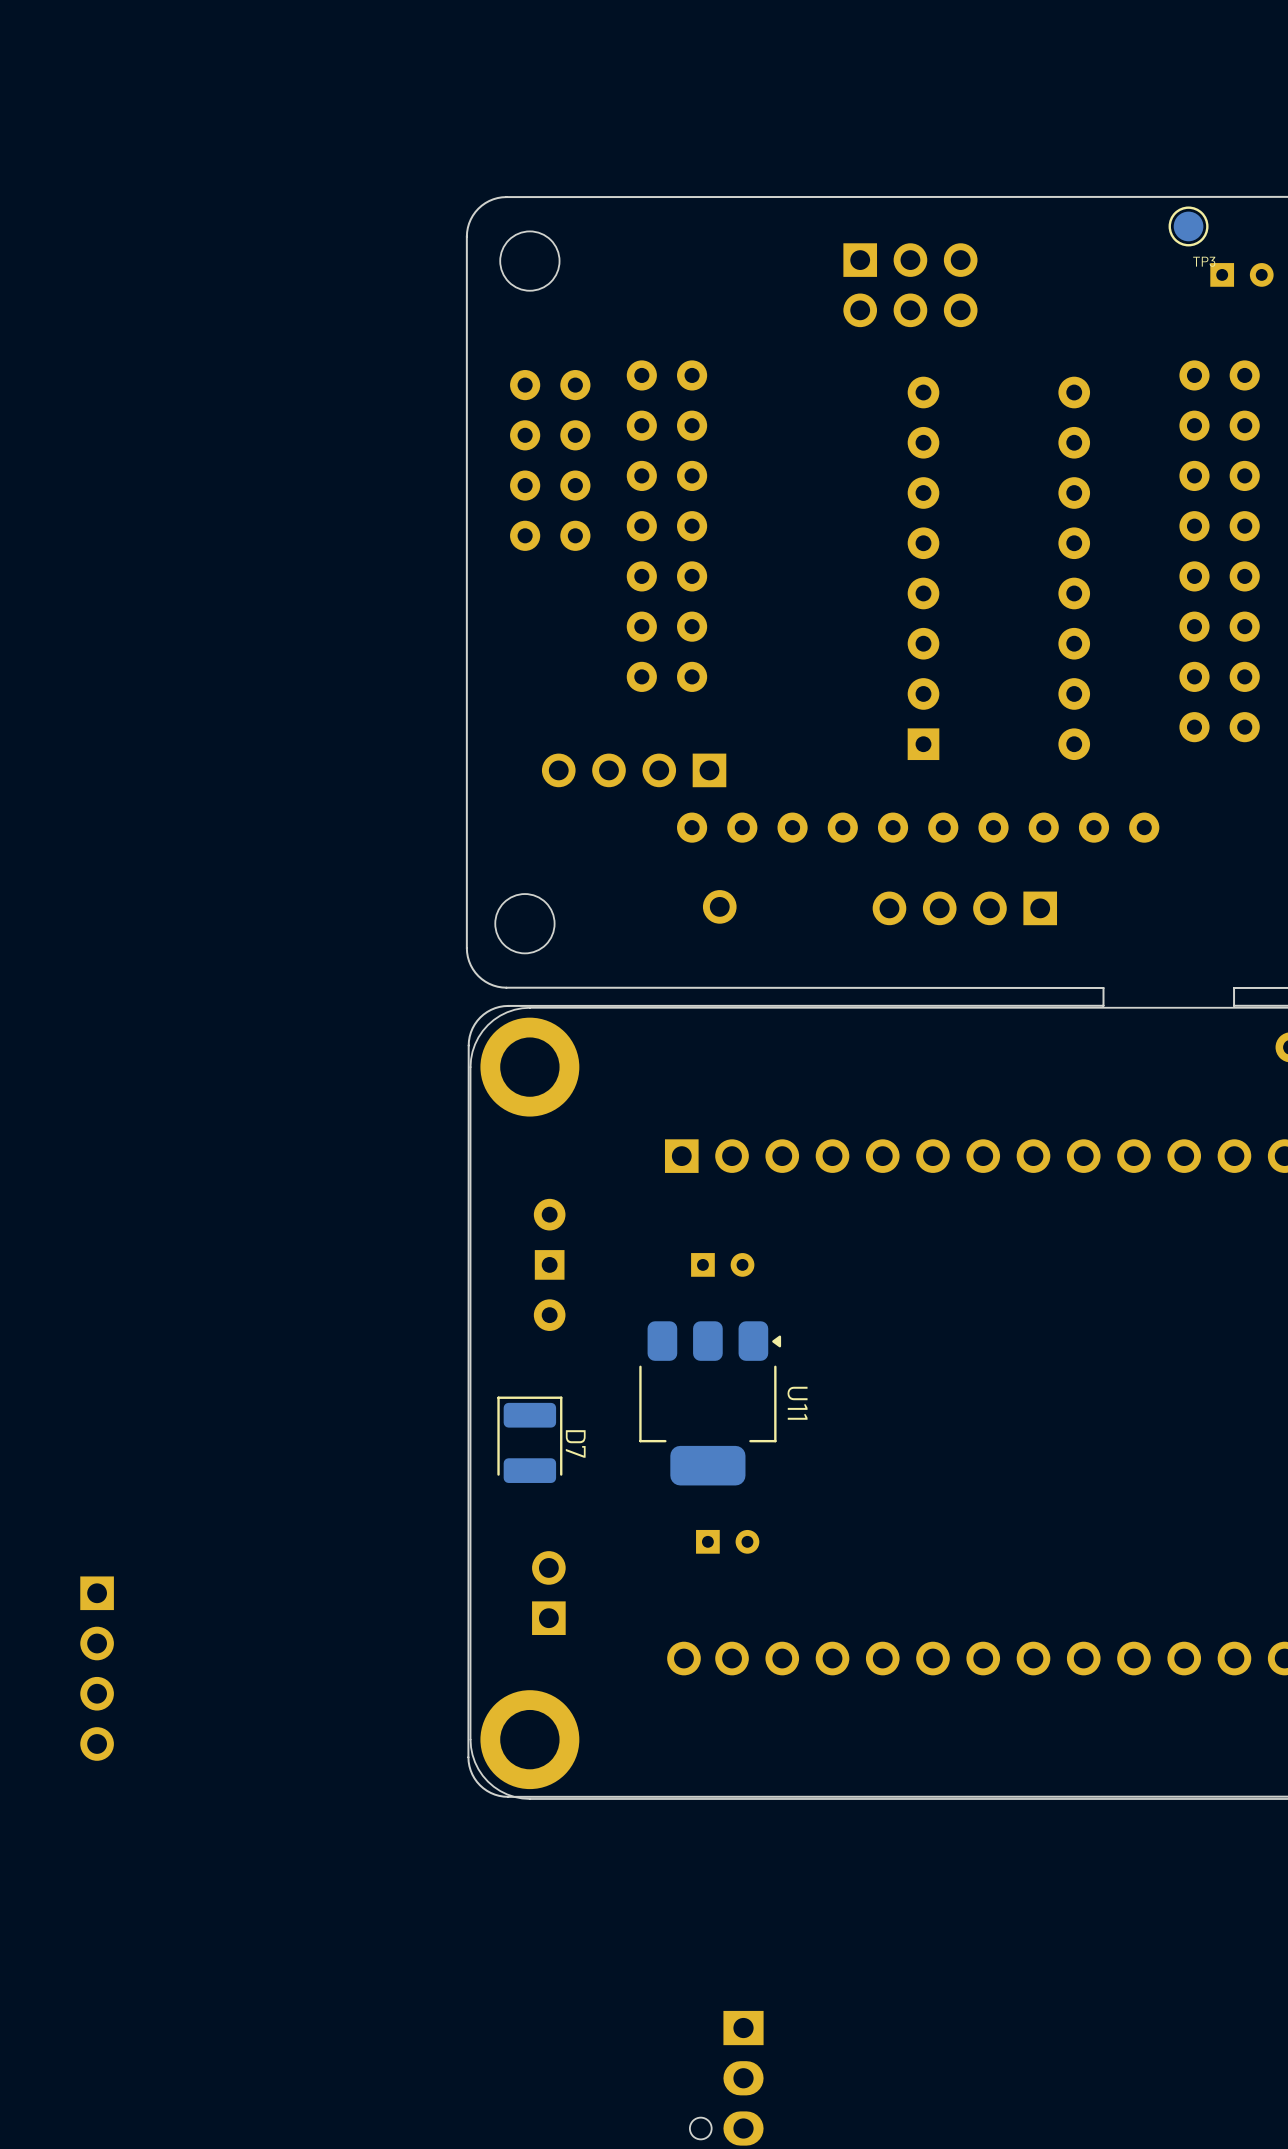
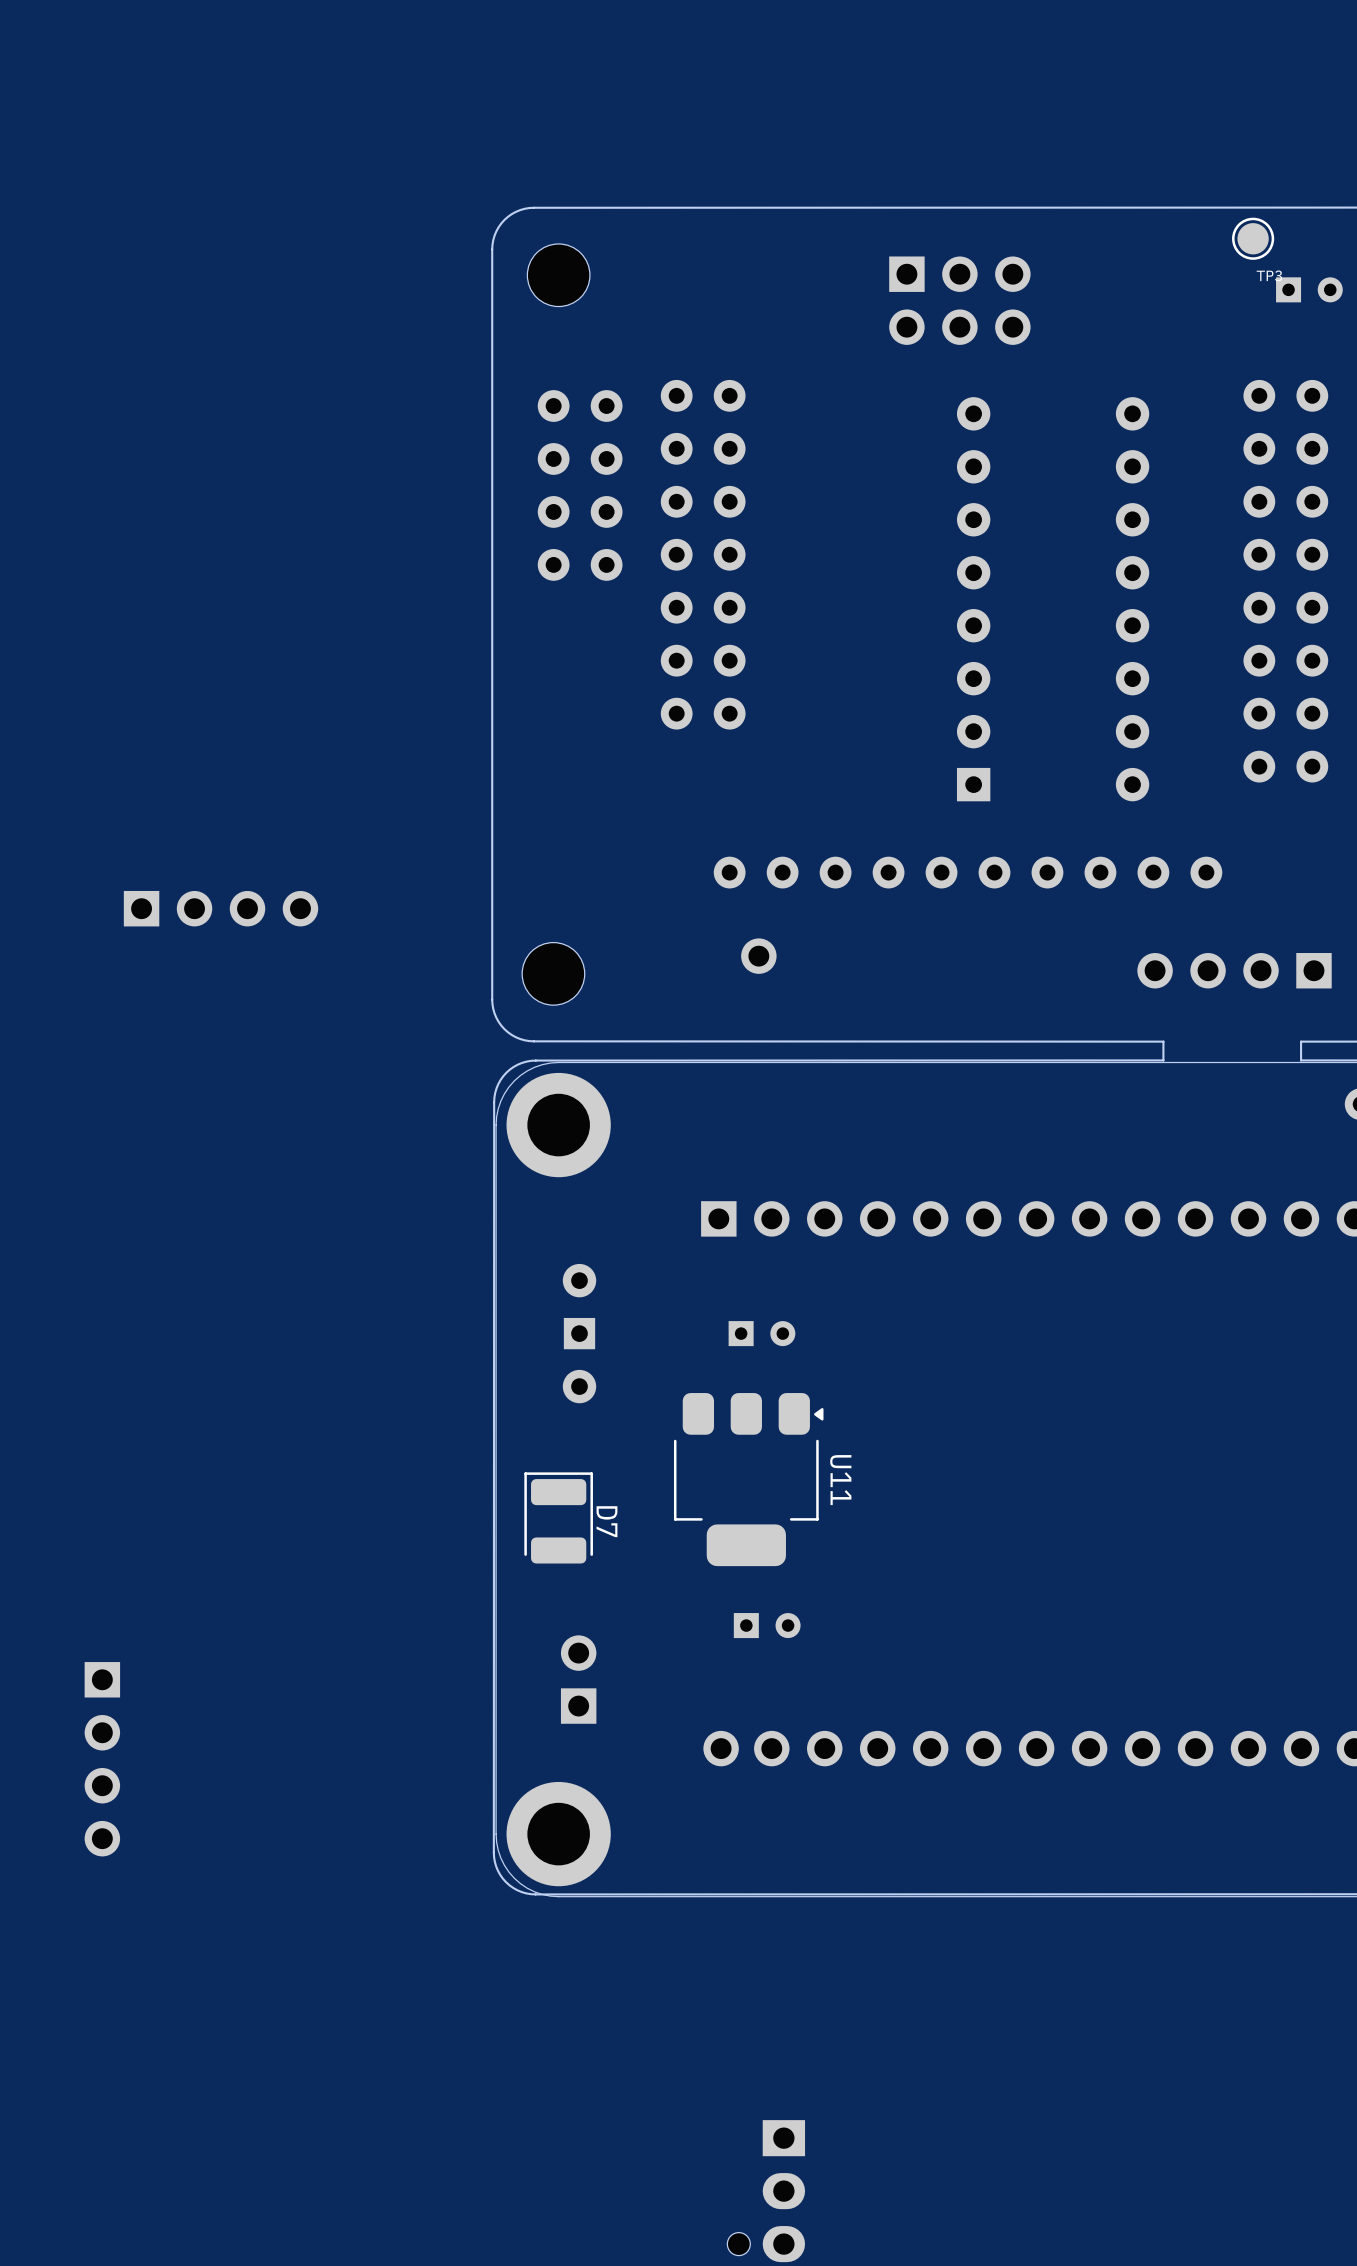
part: (634, 770) -> none
part: none -> (221, 908)
part position: (964, 908) -> (1234, 970)

